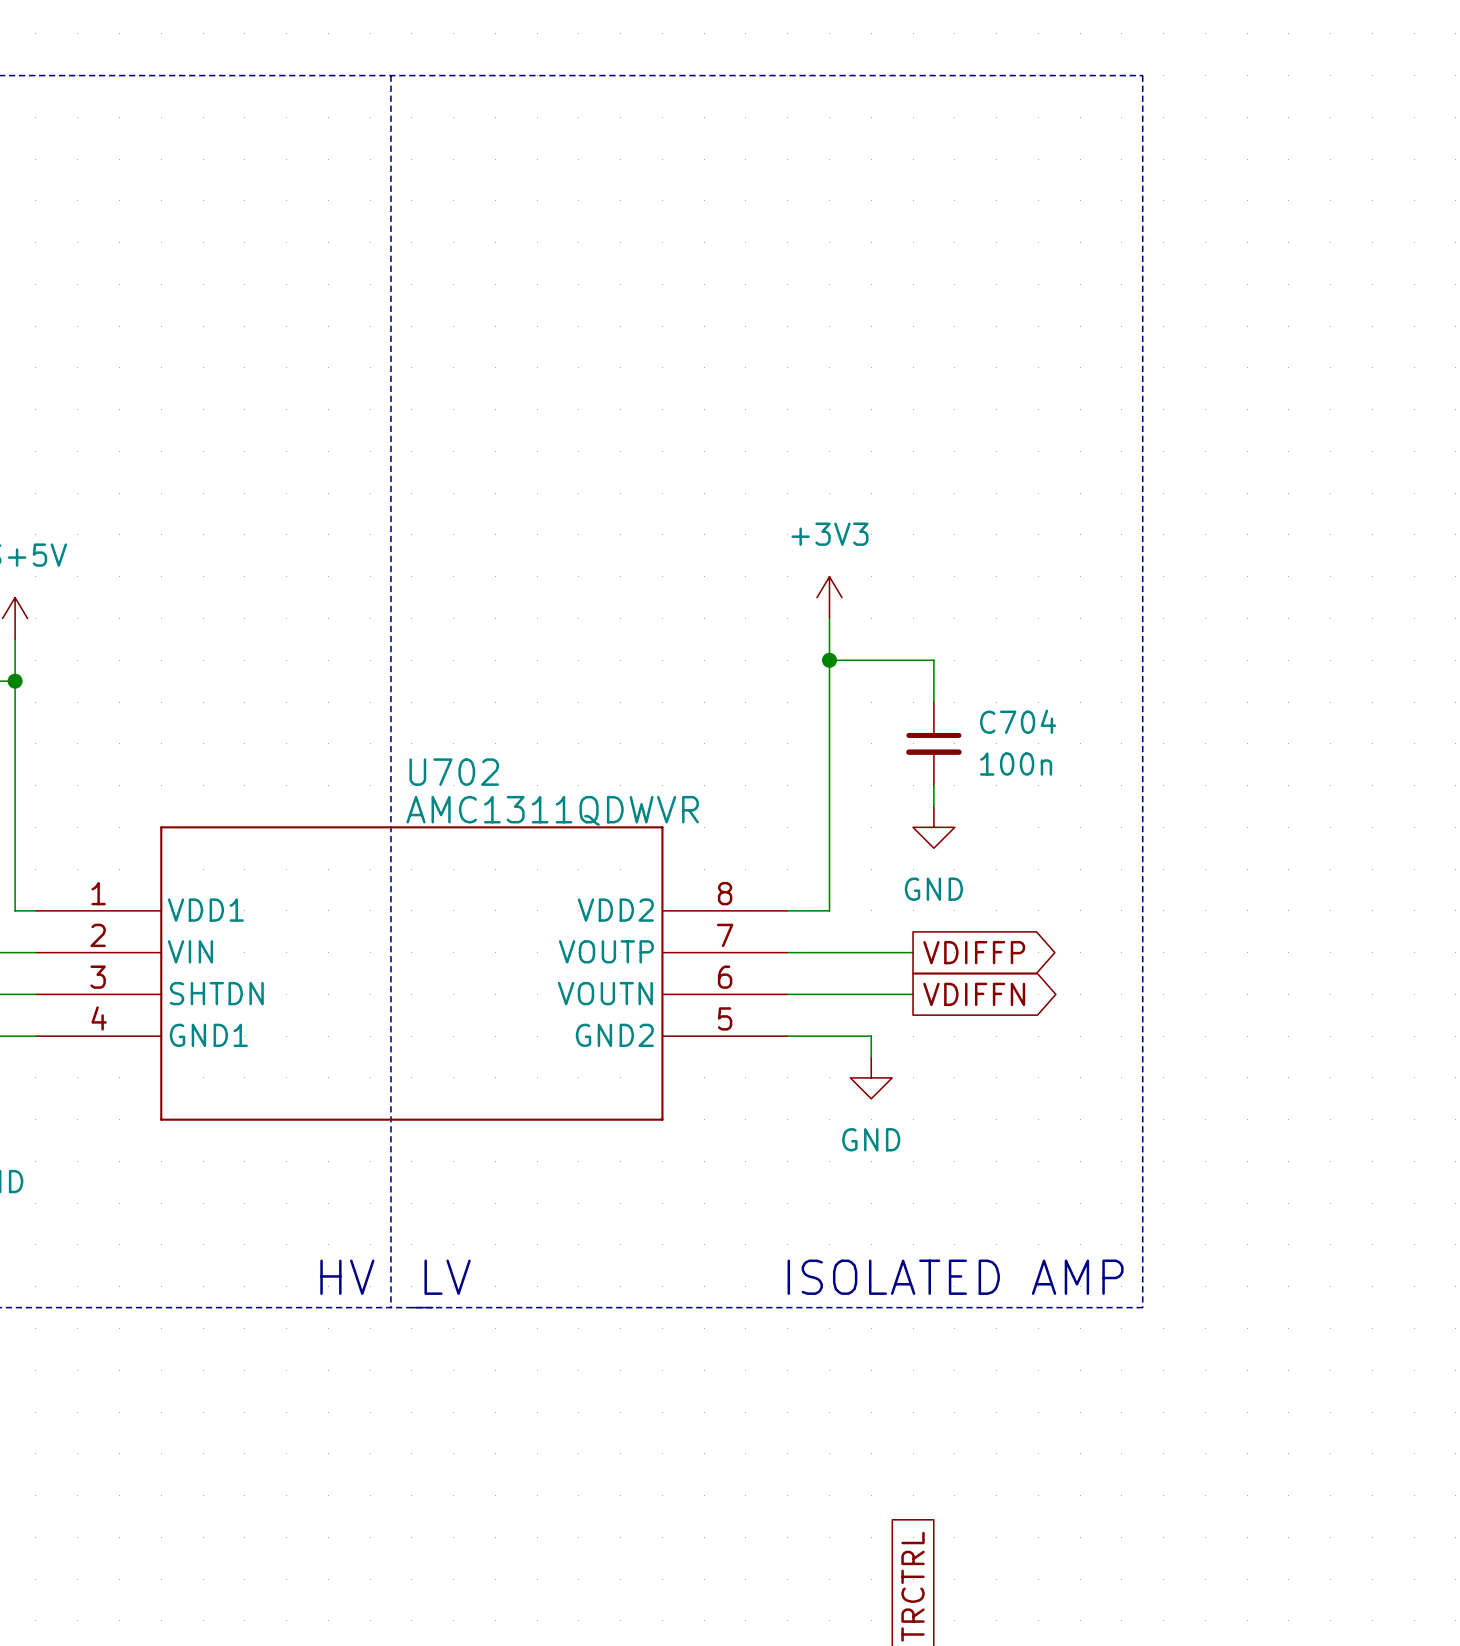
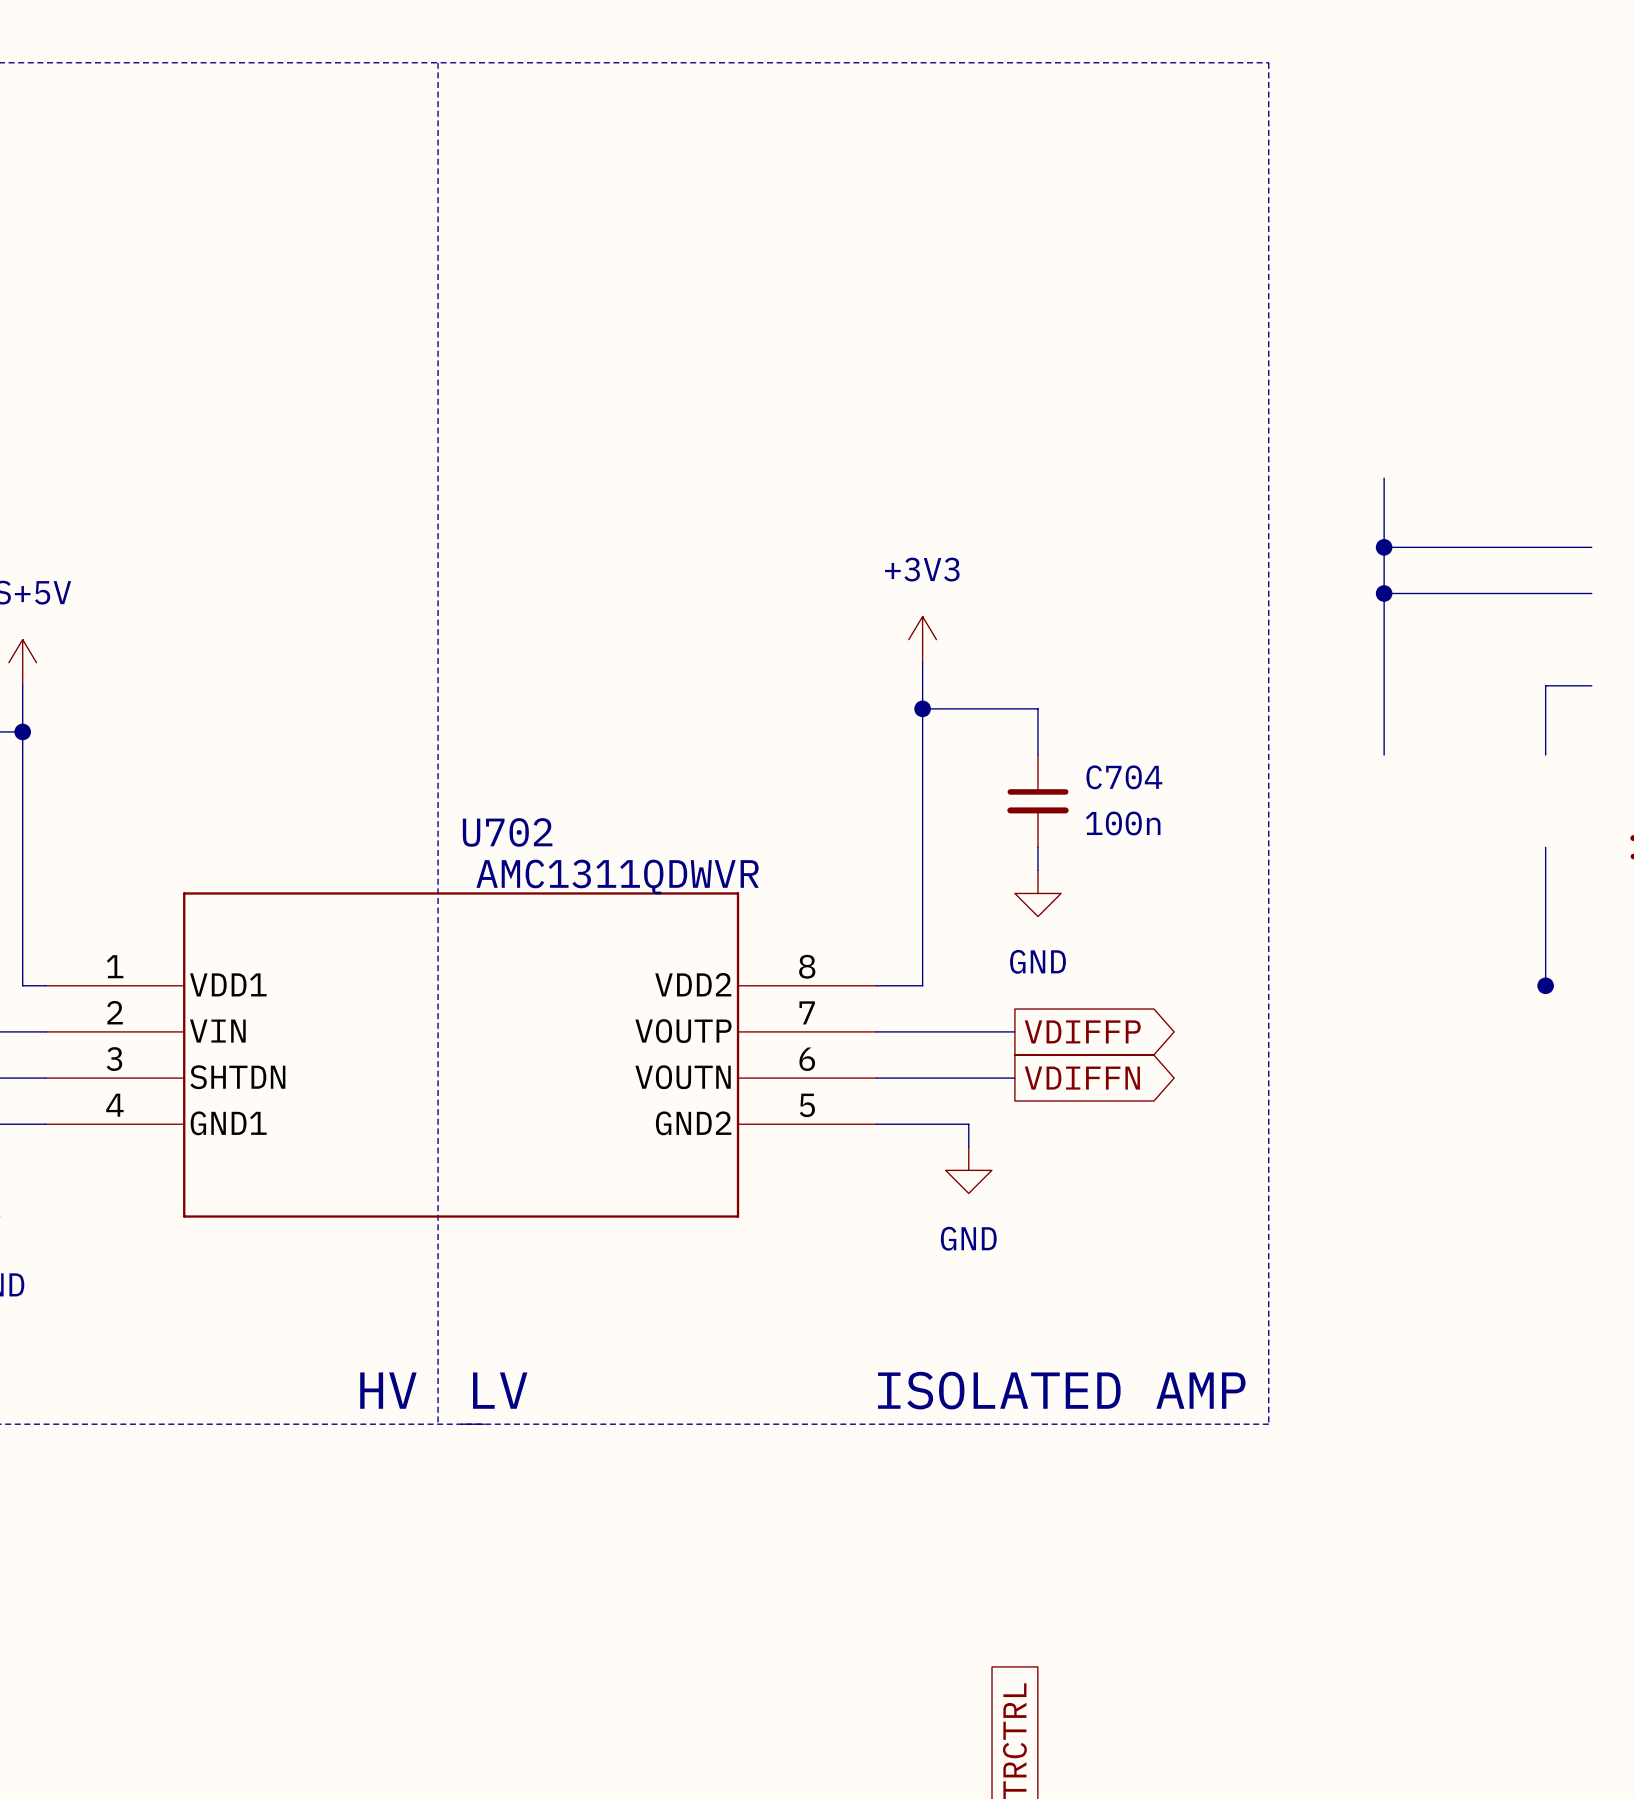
wire: none -> (1384, 478) (1384, 755)
wire: none -> (1384, 547) (1591, 547)
junction: none -> (1384, 547)
wire: none -> (1384, 593) (1591, 593)
junction: none -> (1384, 593)
wire: none -> (1591, 685) (1545, 685) (1545, 755)
wire: none -> (1545, 847) (1545, 985)
junction: none -> (1545, 985)

